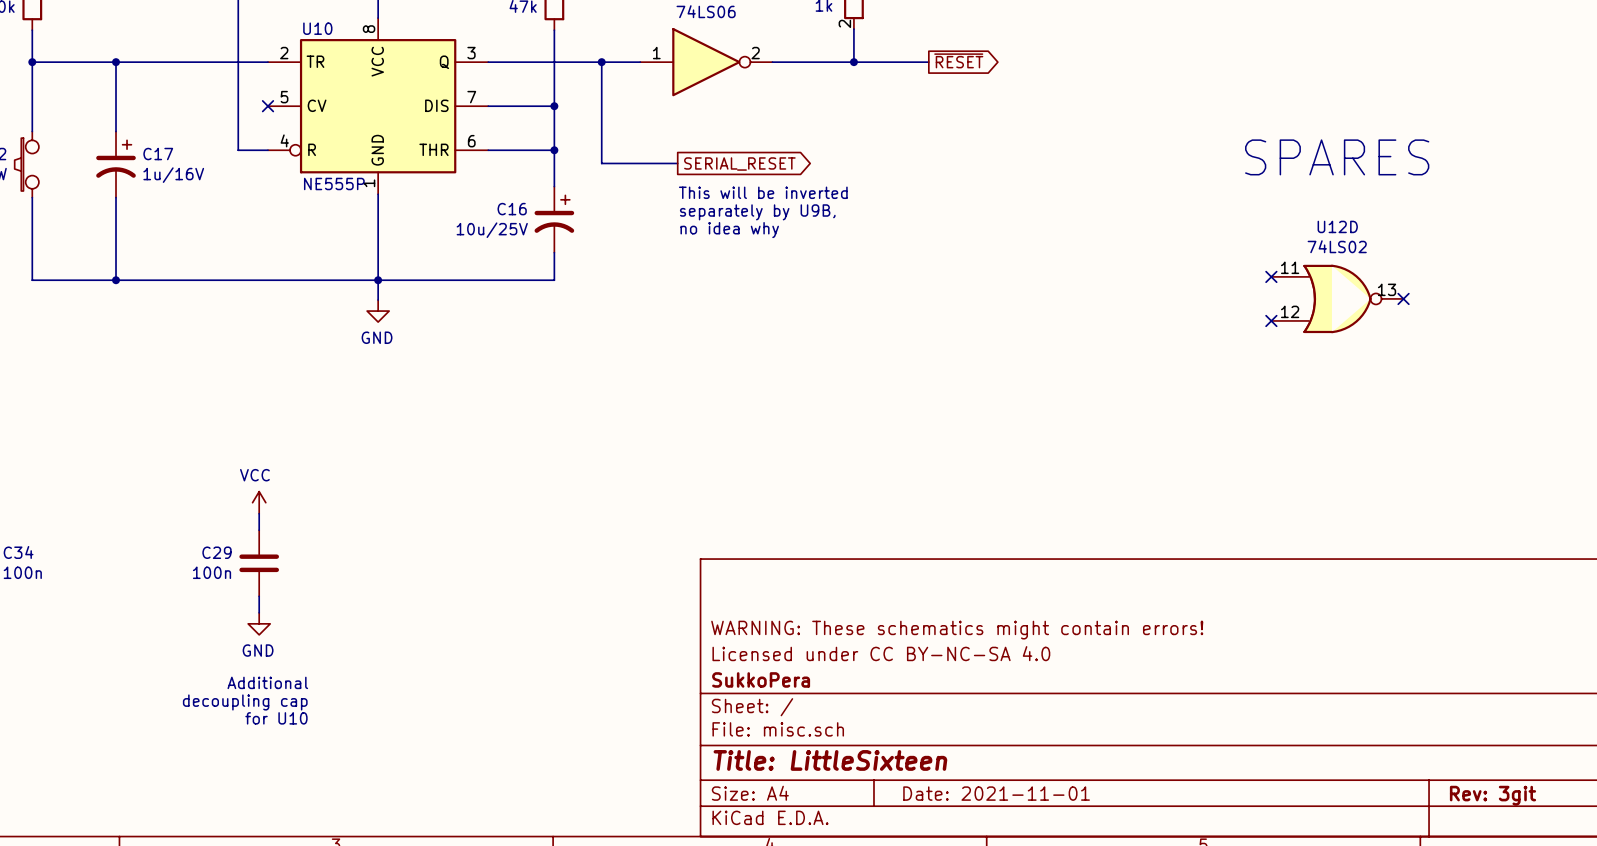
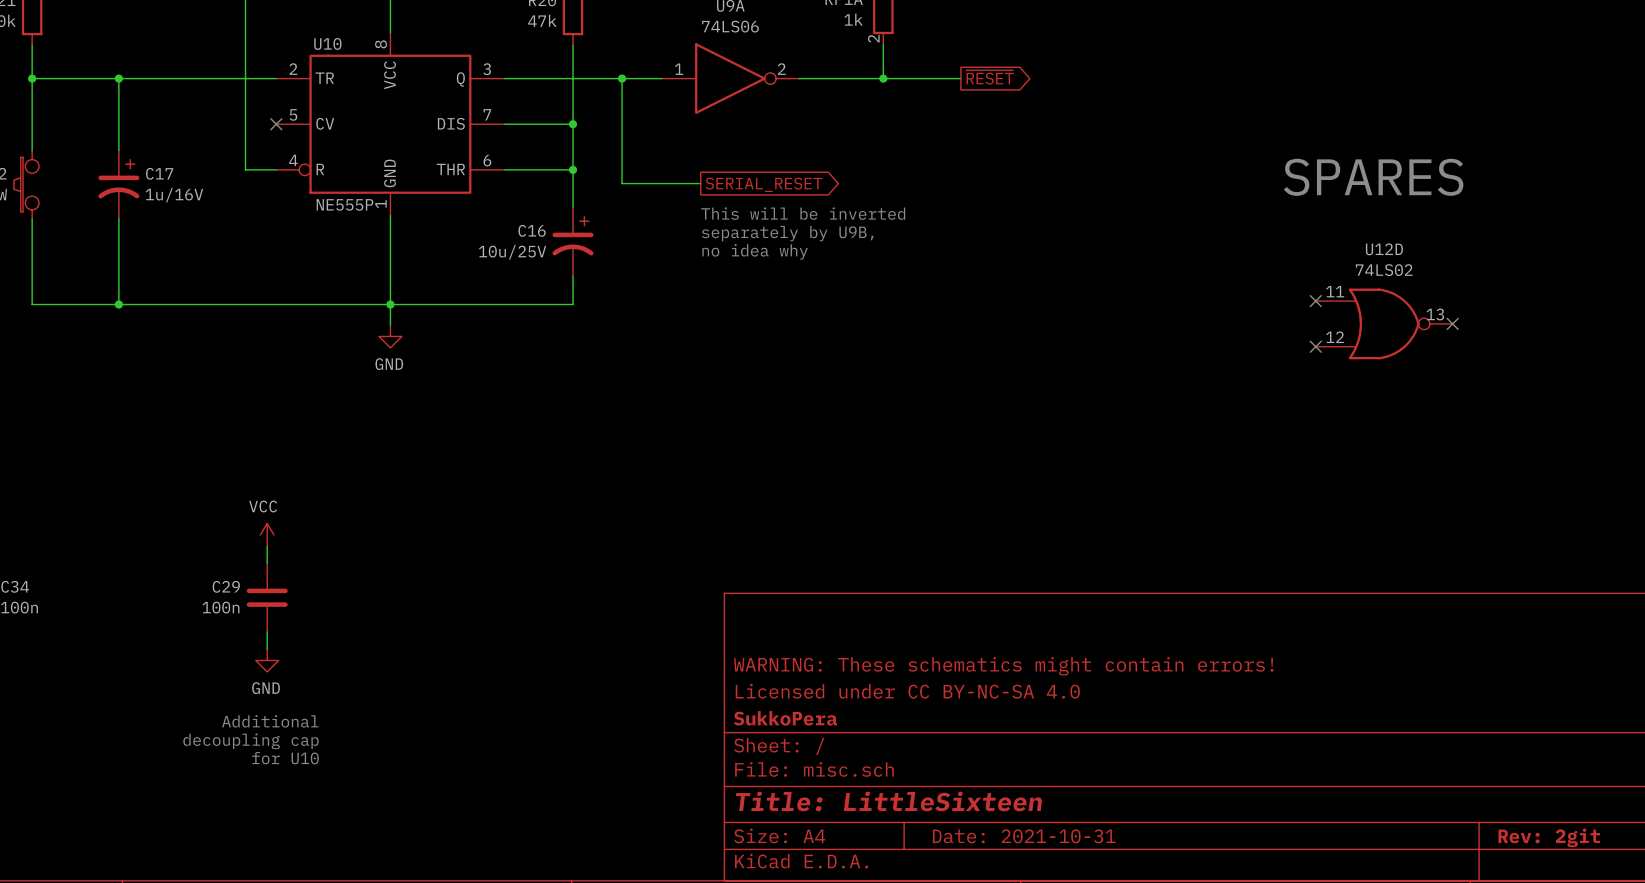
title block: Date: 2021-11-01 (996, 793) -> Date: 2021-10-31 (1024, 836)
title block: Rev: 3git (1492, 795) -> Rev: 2git (1549, 837)

